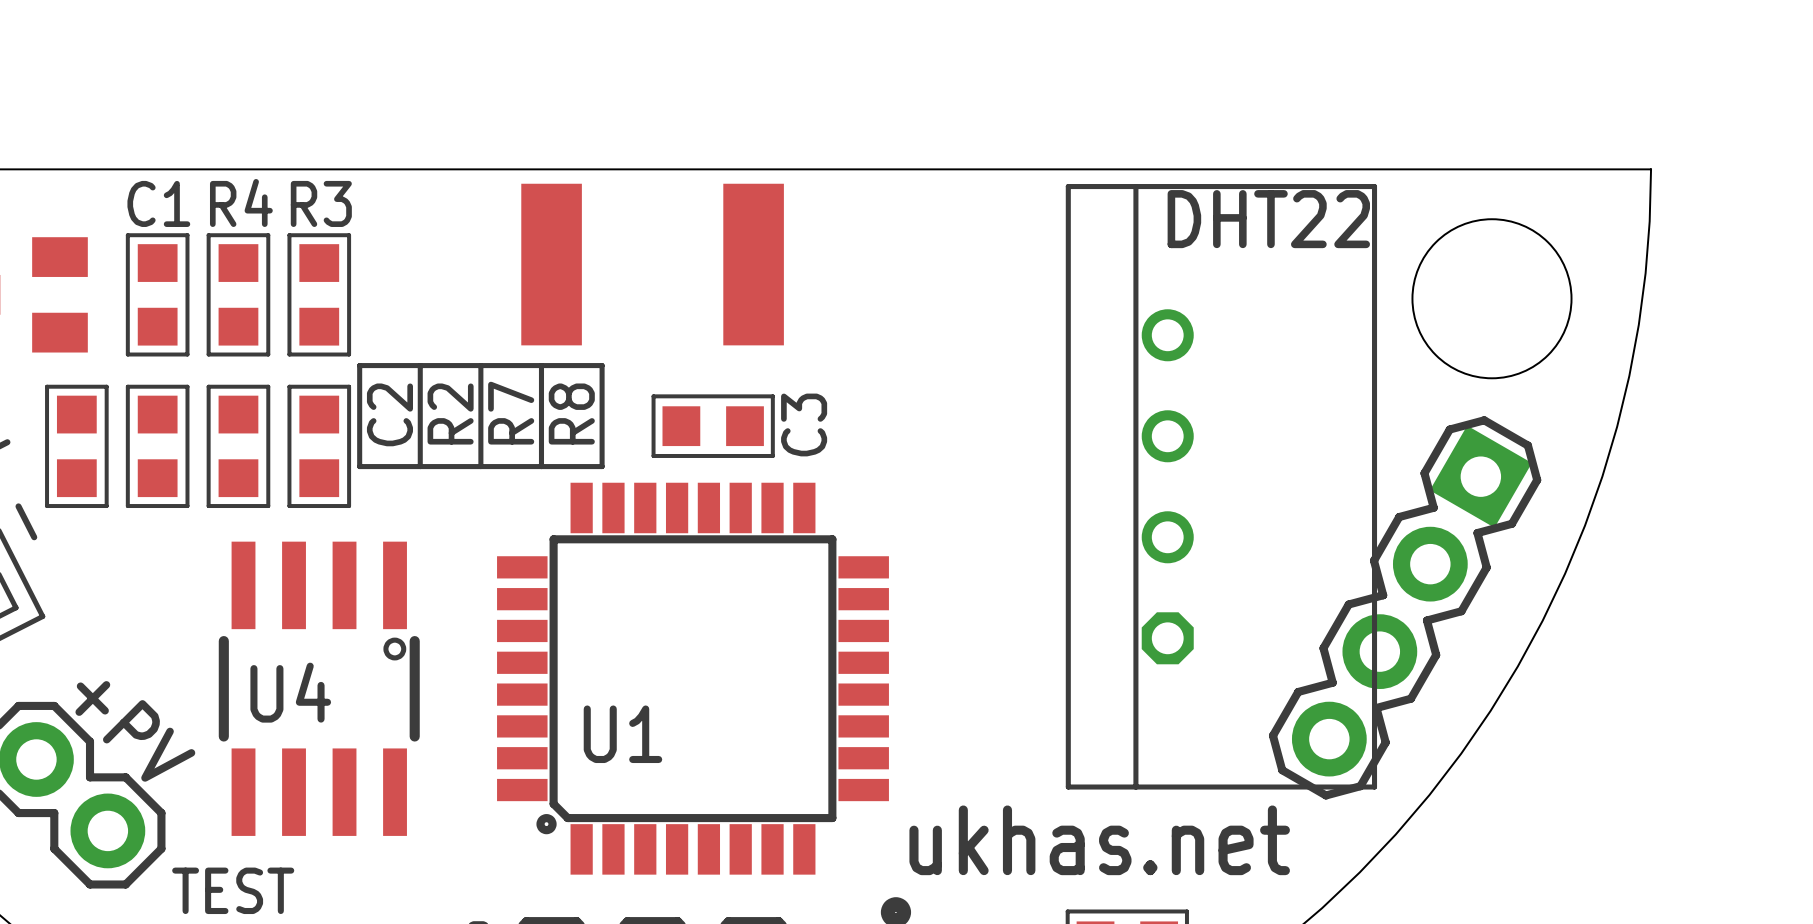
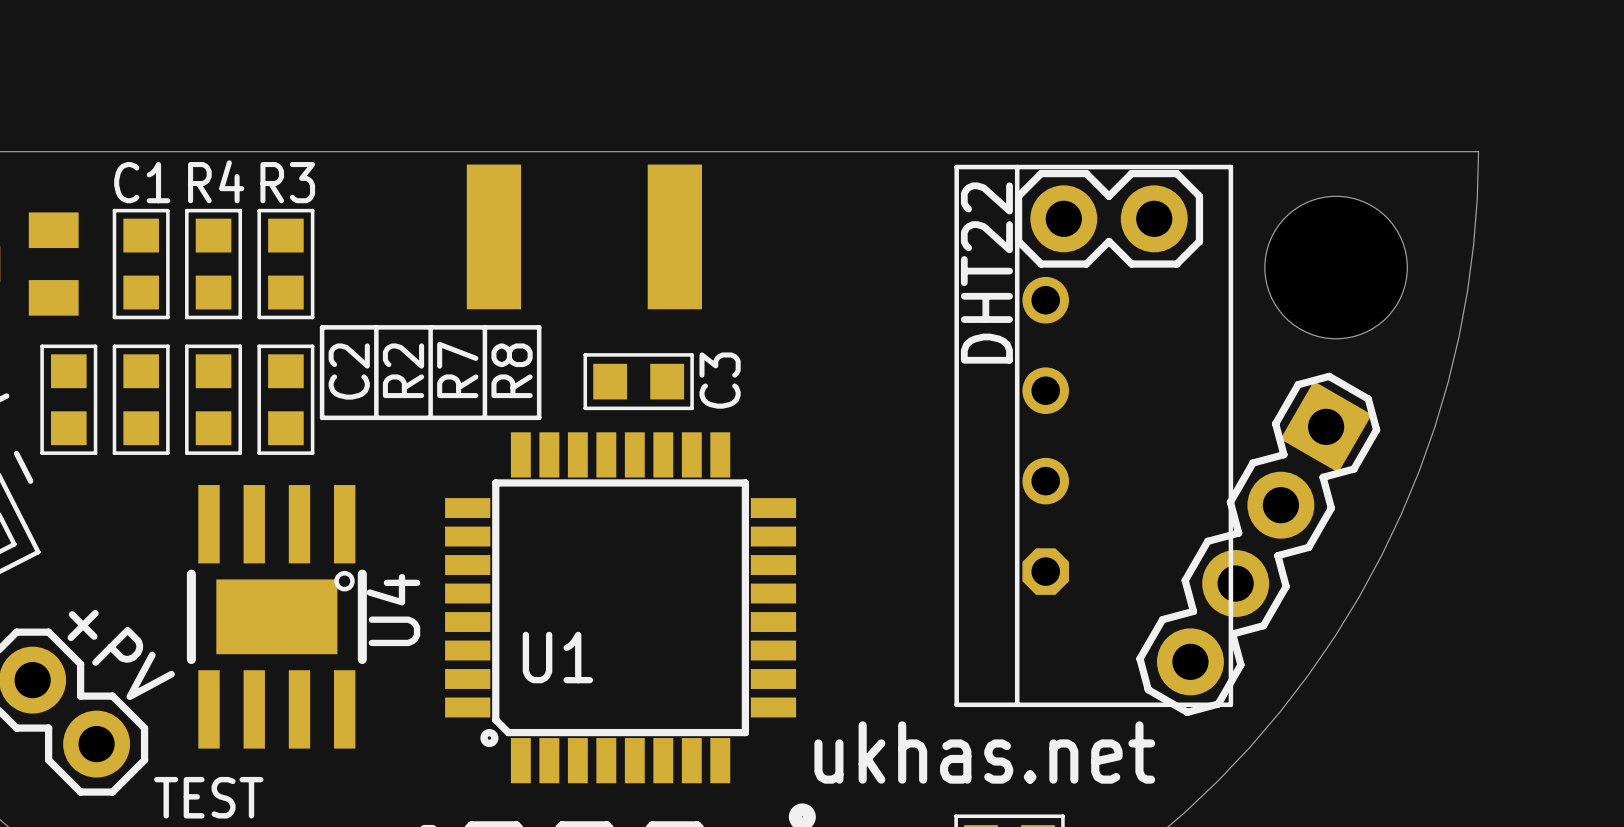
text rotation: 0° (1268, 219) -> 90° counterclockwise (986, 273)
part: none -> (1109, 218)
U4 footprint: [218, 541, 420, 836] -> [186, 485, 367, 749]
U4 name position: U4 (290, 692) -> U4 (393, 610)

